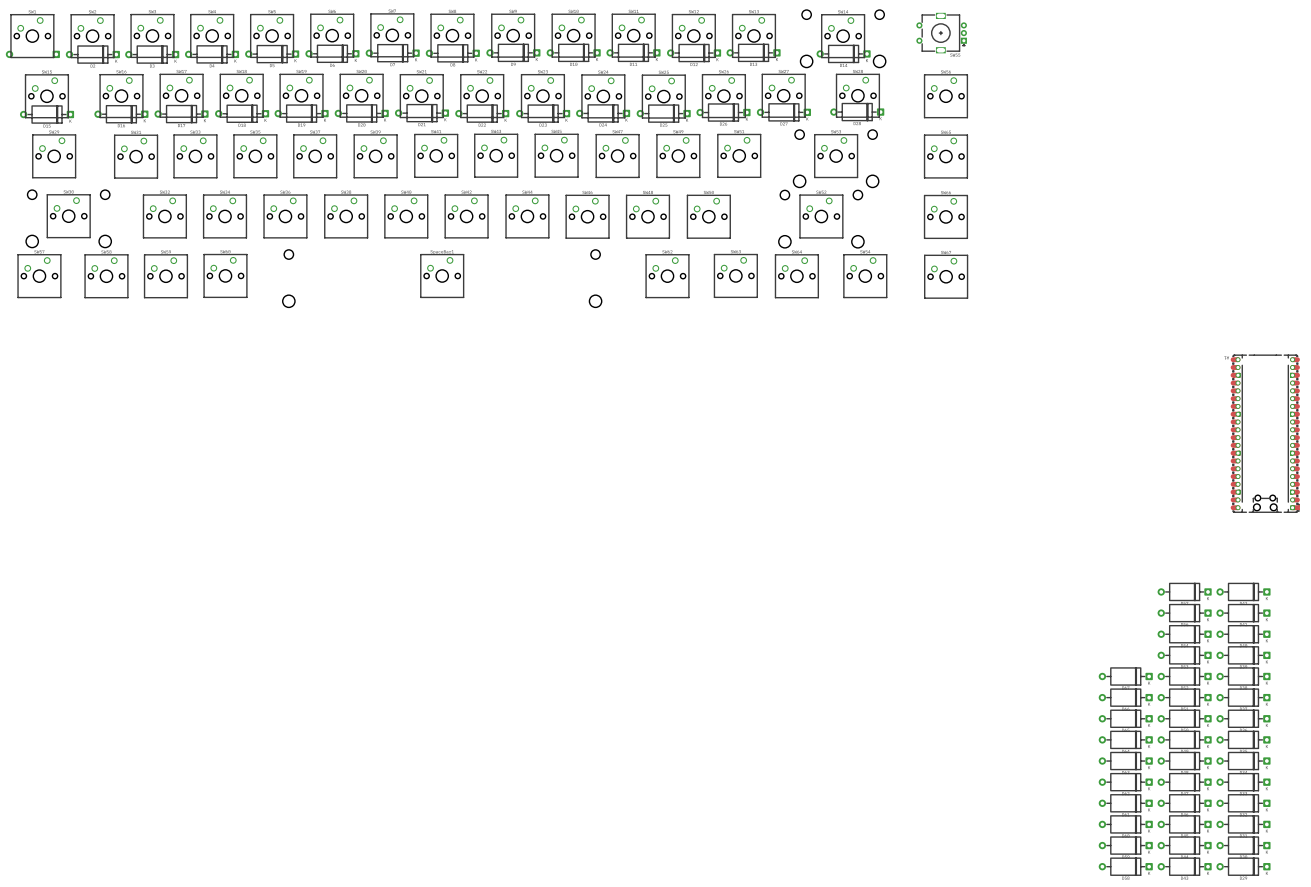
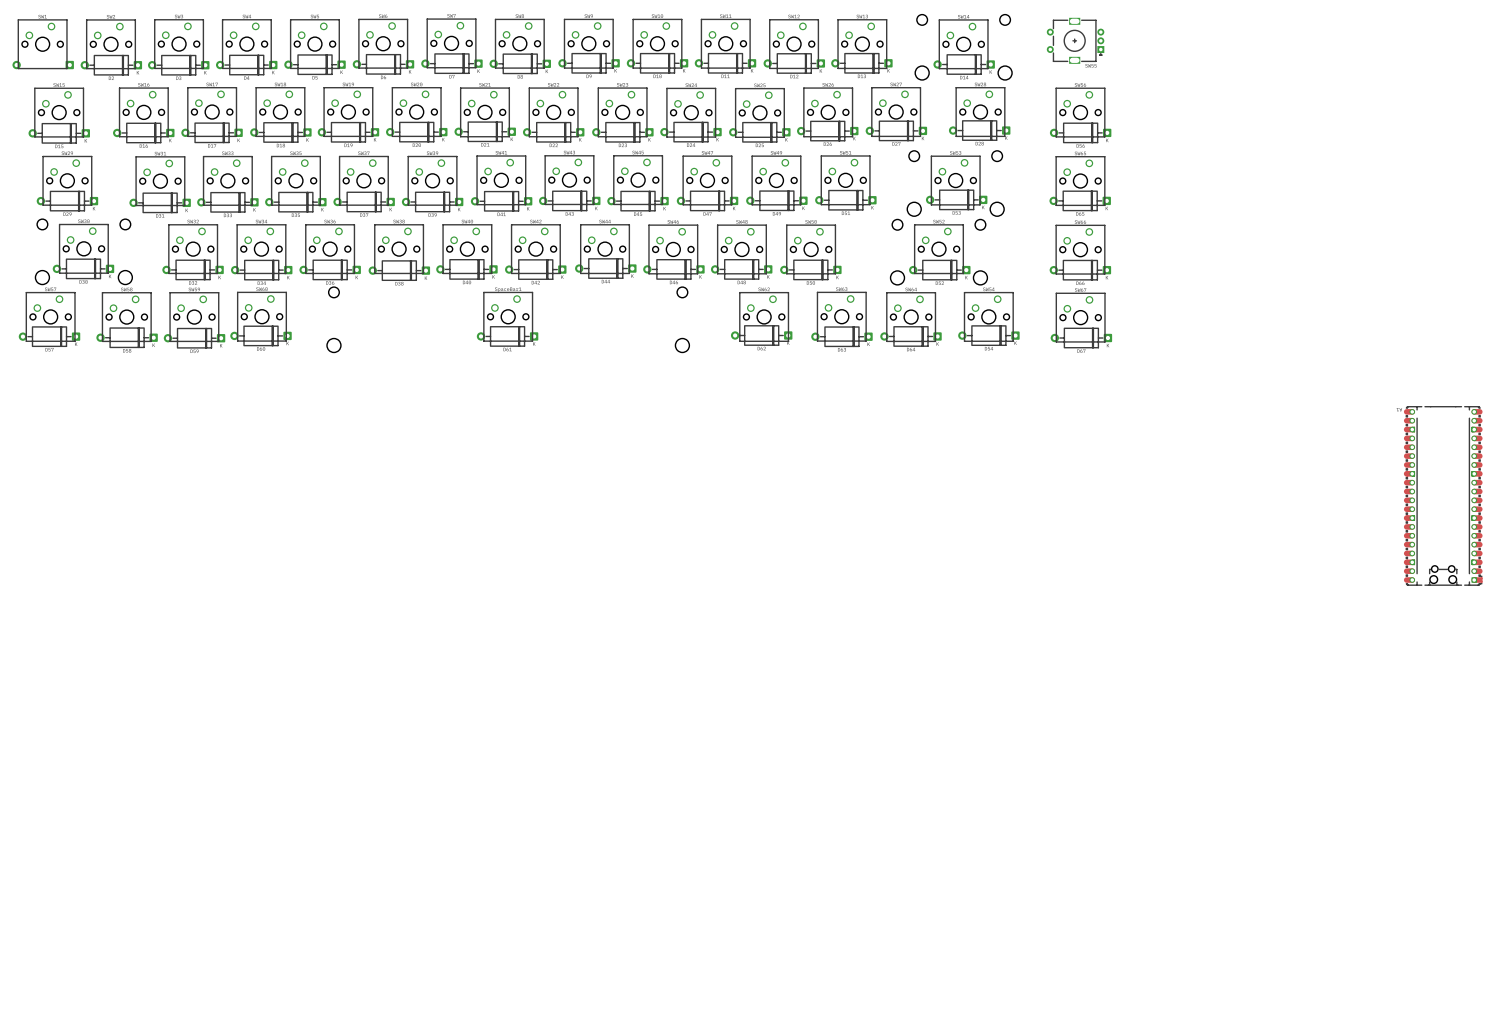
part position: (1184, 591) -> (49, 336)
part position: (1243, 591) -> (535, 269)
part position: (1184, 613) -> (1080, 132)
part position: (1243, 613) -> (501, 201)
part position: (1184, 634) -> (988, 335)
part position: (1243, 634) -> (466, 269)
part position: (1184, 655) -> (956, 199)
part position: (1243, 655) -> (432, 201)
part position: (1125, 676) -> (1081, 338)
part position: (1184, 676) -> (939, 270)
part position: (1243, 676) -> (399, 270)
part position: (1125, 697) -> (1080, 270)
part position: (1184, 697) -> (845, 200)
part position: (1243, 697) -> (364, 201)
part position: (1125, 718) -> (1080, 200)
part position: (1184, 718) -> (810, 269)
part position: (1243, 718) -> (330, 269)
part position: (1125, 739) -> (910, 336)
part position: (1184, 739) -> (776, 200)
part position: (1243, 739) -> (295, 202)
part position: (1125, 761) -> (841, 336)
part position: (1184, 761) -> (741, 269)
part position: (1243, 761) -> (261, 270)
part position: (1125, 782) -> (761, 335)
part position: (1184, 782) -> (707, 200)
part position: (1243, 782) -> (227, 202)
part position: (1125, 803) -> (507, 336)
part position: (1184, 803) -> (673, 269)
part position: (1243, 803) -> (193, 269)
part position: (1125, 824) -> (261, 335)
part position: (1184, 824) -> (638, 201)
part position: (1243, 824) -> (160, 202)
part position: (1125, 845) -> (194, 338)
part position: (1184, 845) -> (605, 268)
part position: (1243, 845) -> (83, 268)
part position: (1125, 866) -> (127, 337)
part position: (1184, 866) -> (569, 200)
part position: (1243, 866) -> (67, 201)

